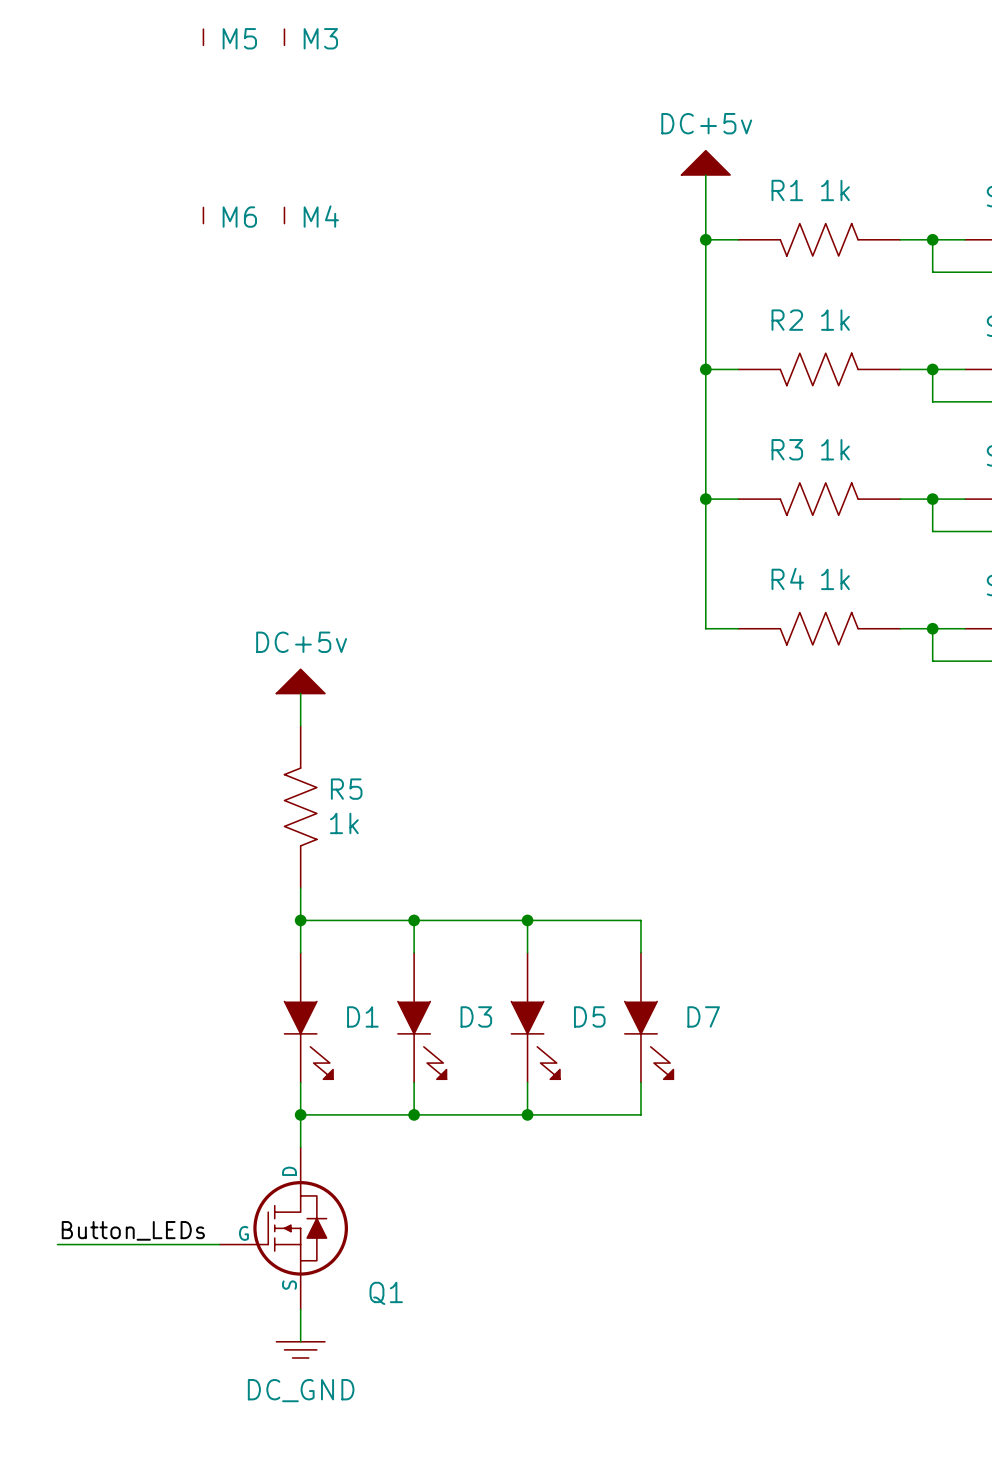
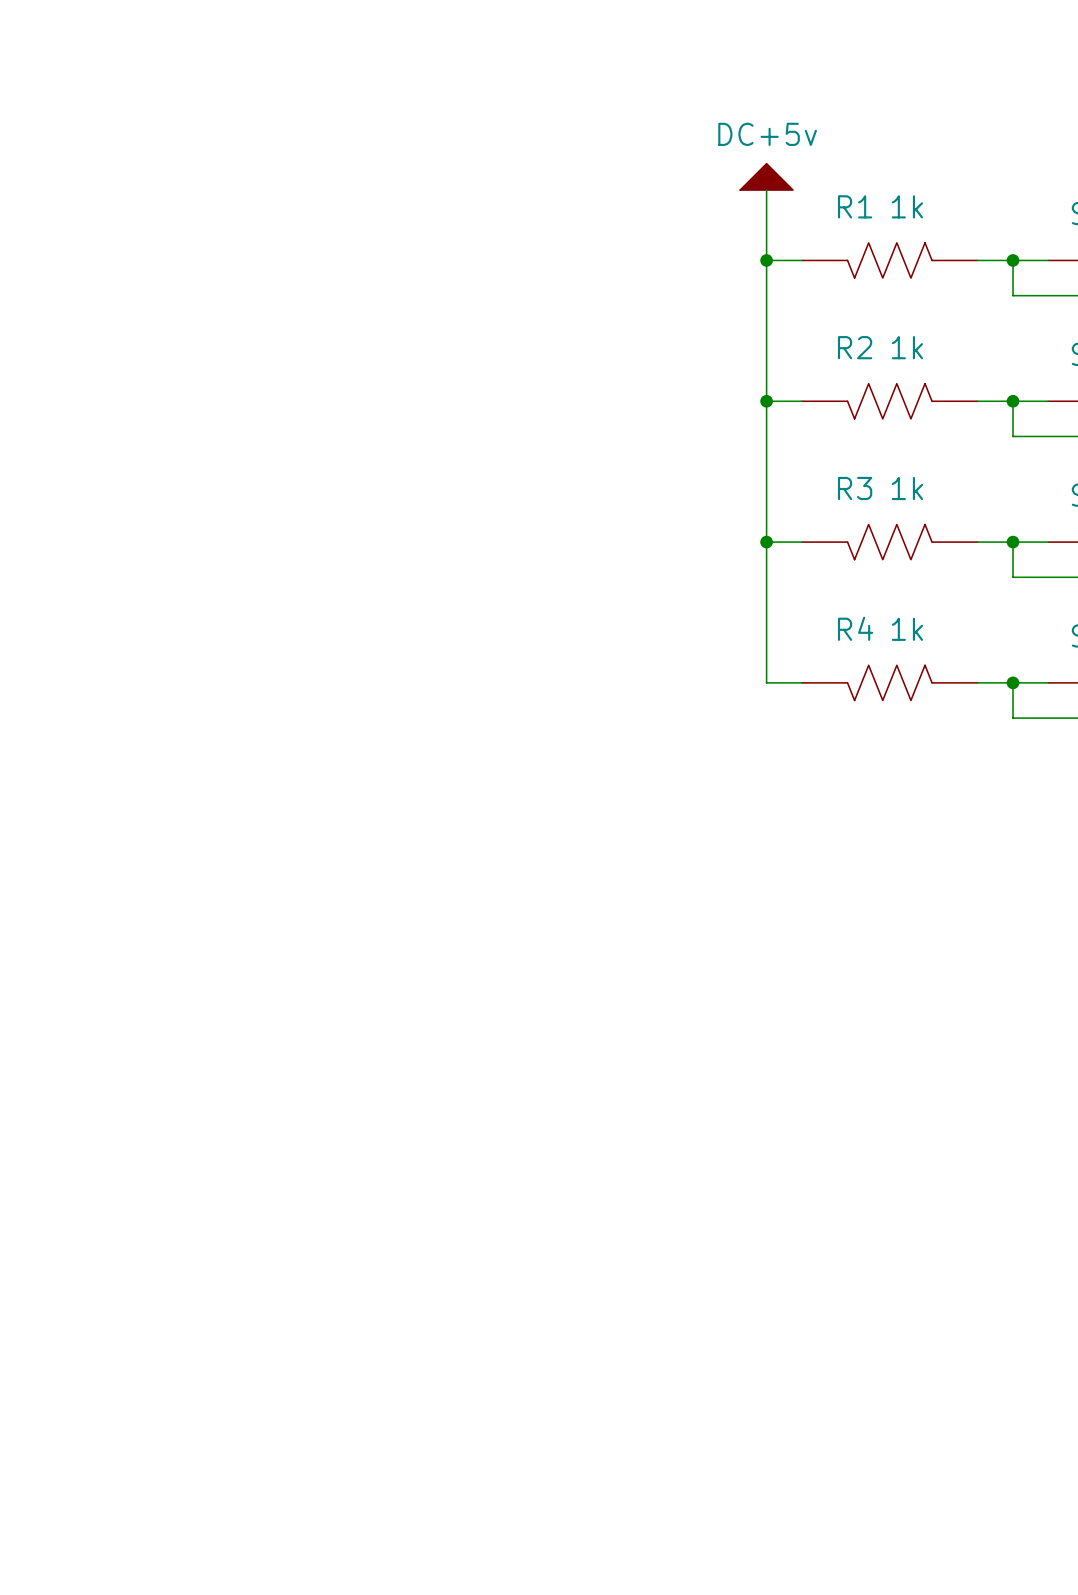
M5: (203, 37) -> none
M3: (284, 37) -> none
M6: (203, 215) -> none
M4: (284, 215) -> none
power symbol: DC+5v (300, 681) -> none
wire: (300, 693) (300, 725) -> none
R5: (300, 807) -> none
wire: (300, 888) (300, 952) -> none
wire: (300, 920) (640, 920) (640, 952) -> none
junction: (300, 920) -> none
wire: (414, 920) (414, 952) -> none
junction: (414, 920) -> none
wire: (527, 920) (527, 952) -> none
junction: (527, 920) -> none
D1: (308, 1017) -> none
D3: (422, 1017) -> none
D5: (535, 1017) -> none
D7: (649, 1017) -> none
wire: (300, 1082) (300, 1147) -> none
wire: (414, 1082) (414, 1114) -> none
wire: (527, 1082) (527, 1114) -> none
wire: (640, 1082) (640, 1114) (300, 1114) -> none
junction: (300, 1114) -> none
junction: (414, 1114) -> none
junction: (527, 1114) -> none
Q1: (283, 1228) -> none
label: Button_LEDs (133, 1230) -> none
wire: (57, 1244) (219, 1244) -> none
wire: (300, 1309) (300, 1341) -> none
power symbol: DC_GND (300, 1349) -> none

